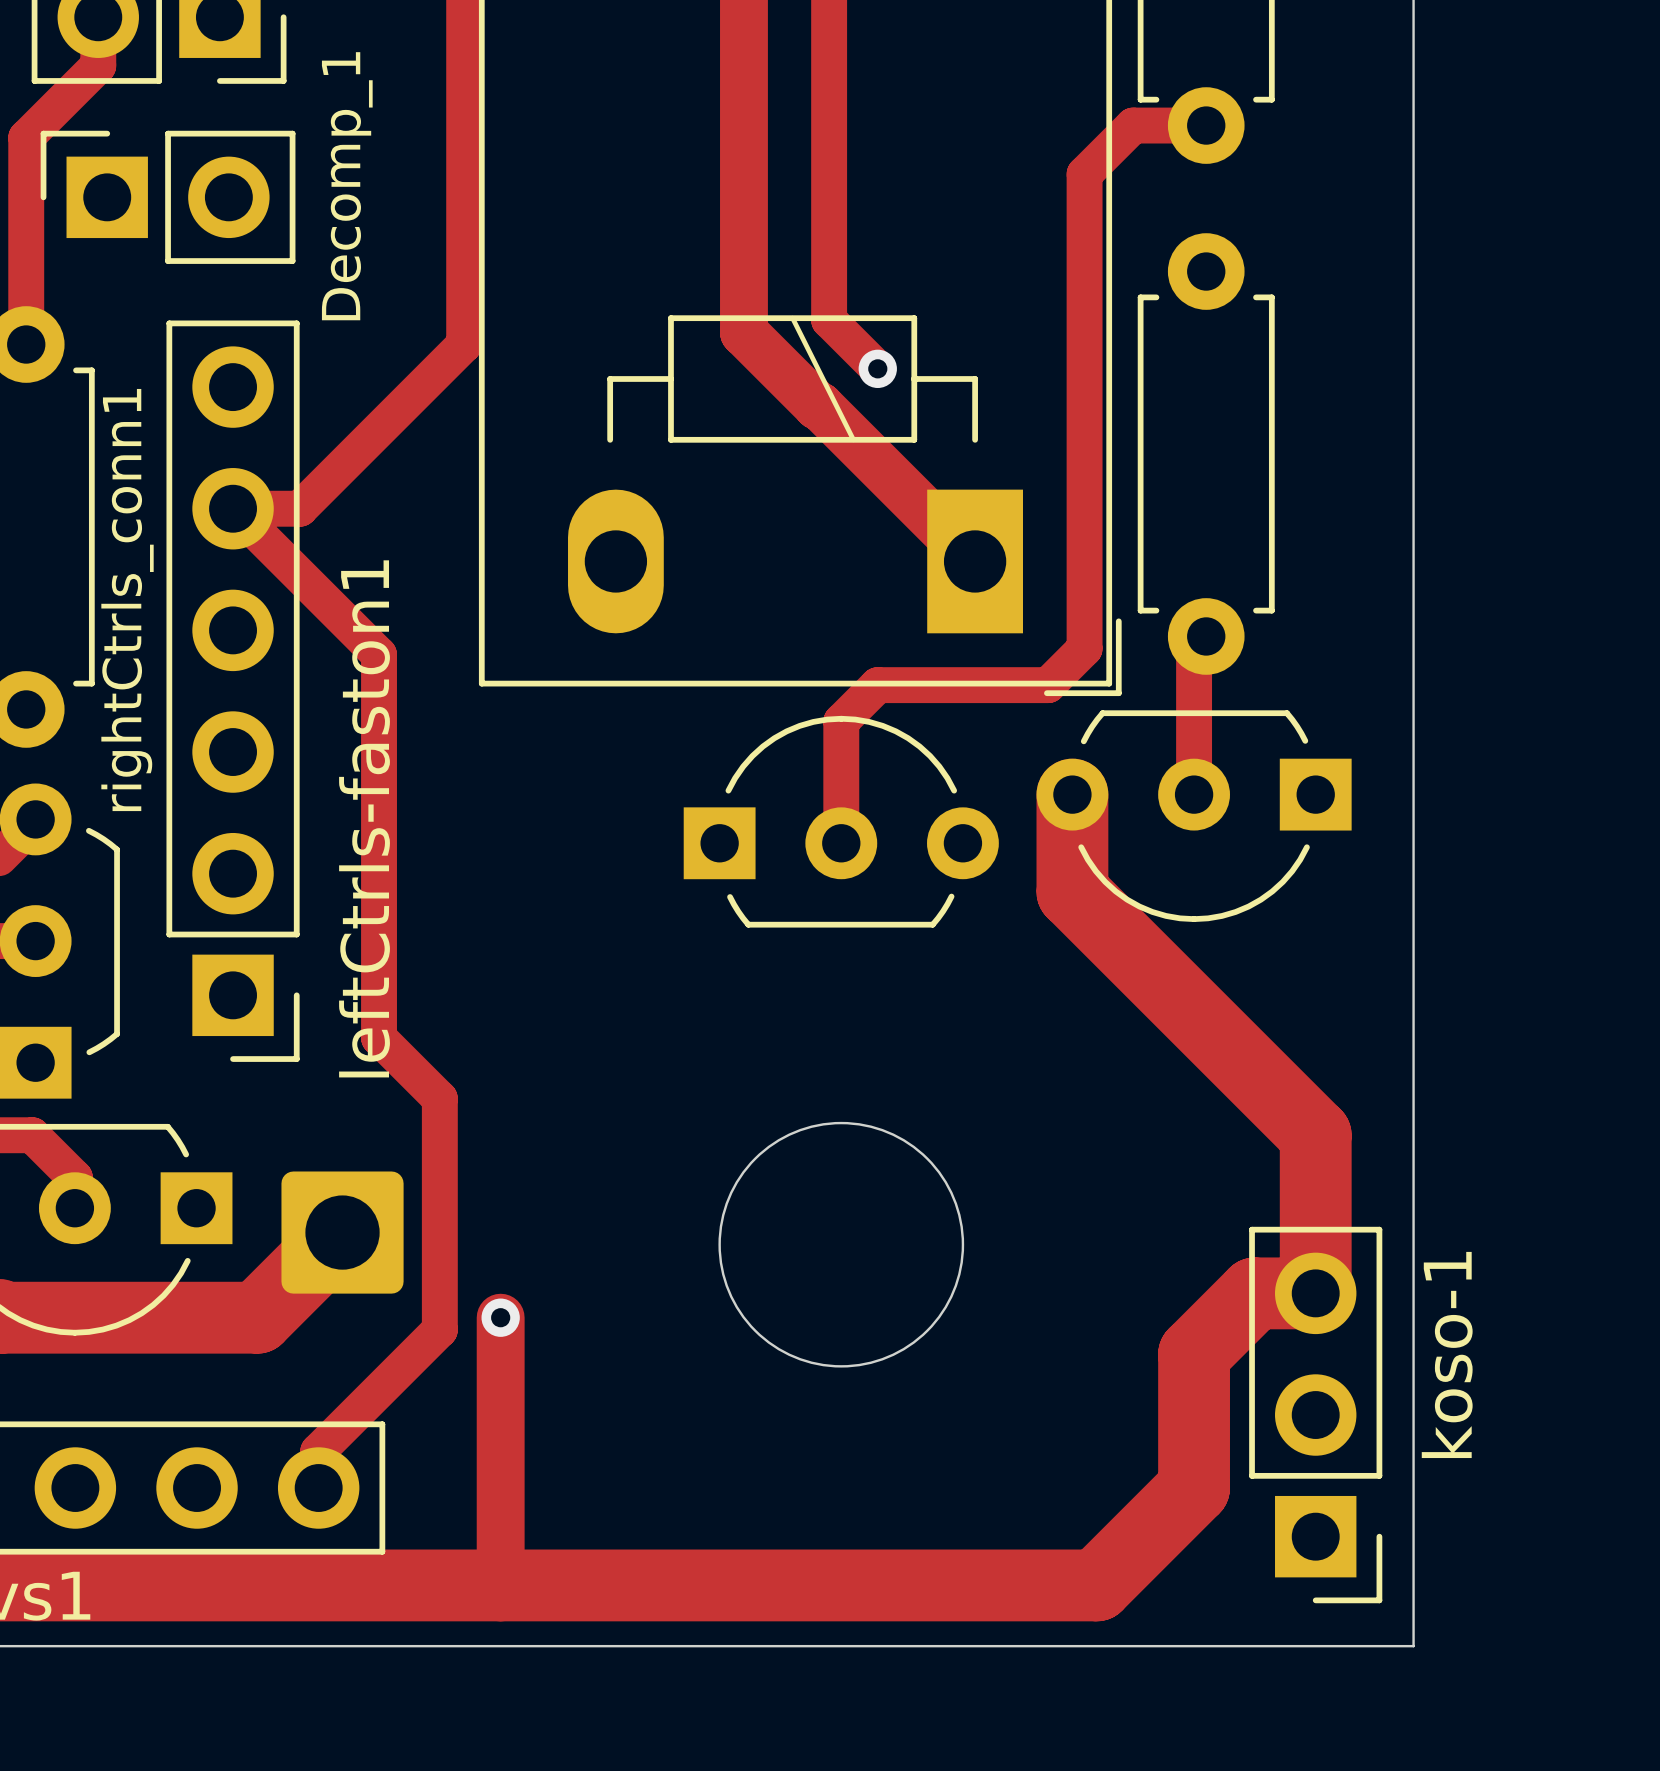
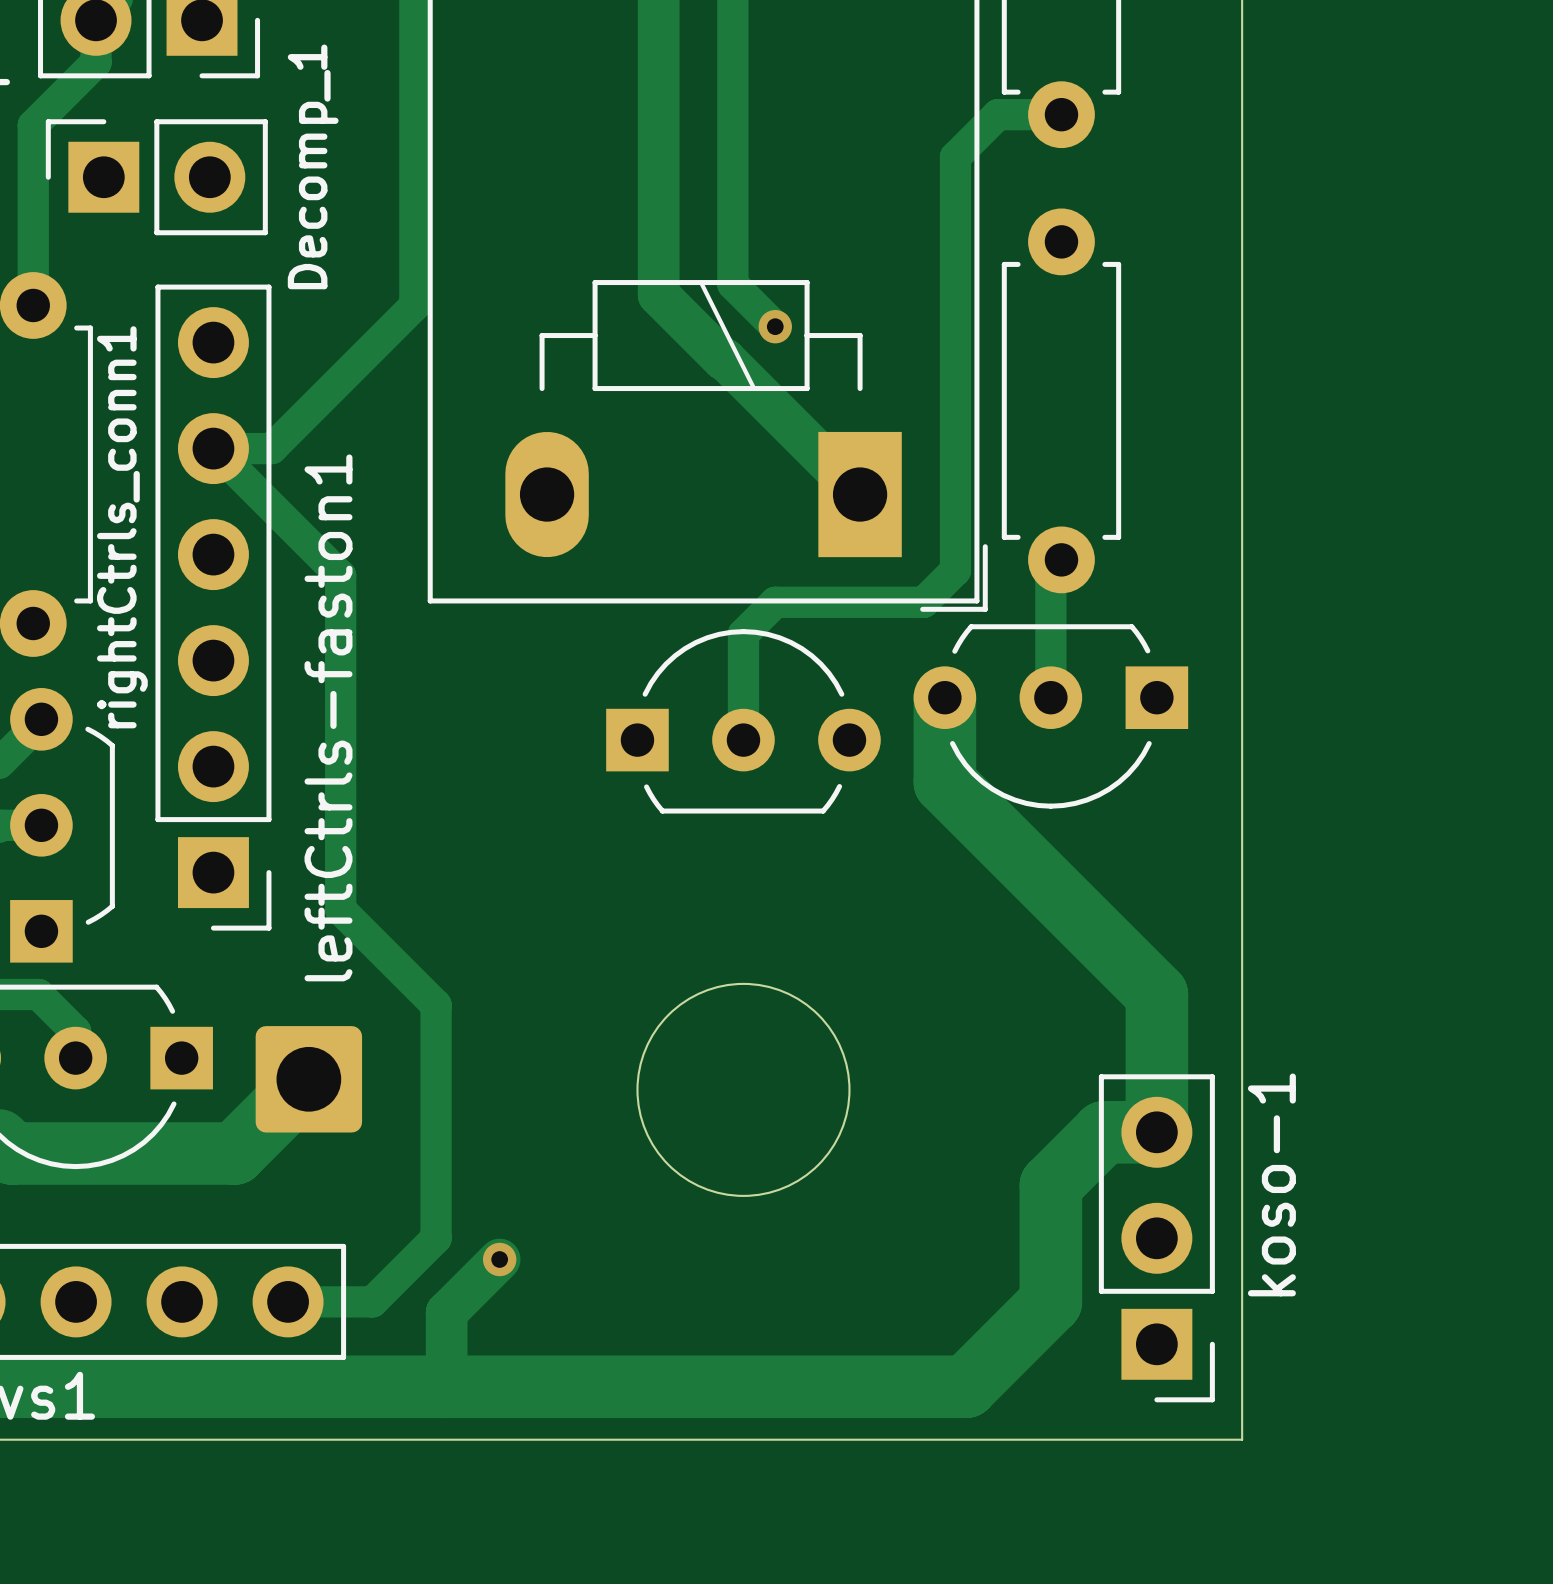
track: (439, 1098) (439, 1329) (318, 1451) (318, 1487) -> (393, 962) (436, 1005) (436, 1238) (372, 1301) (288, 1301)
track: (500, 1317) (500, 1500) -> (499, 1259) (446, 1312)
via position: (500, 1317) -> (499, 1259)

